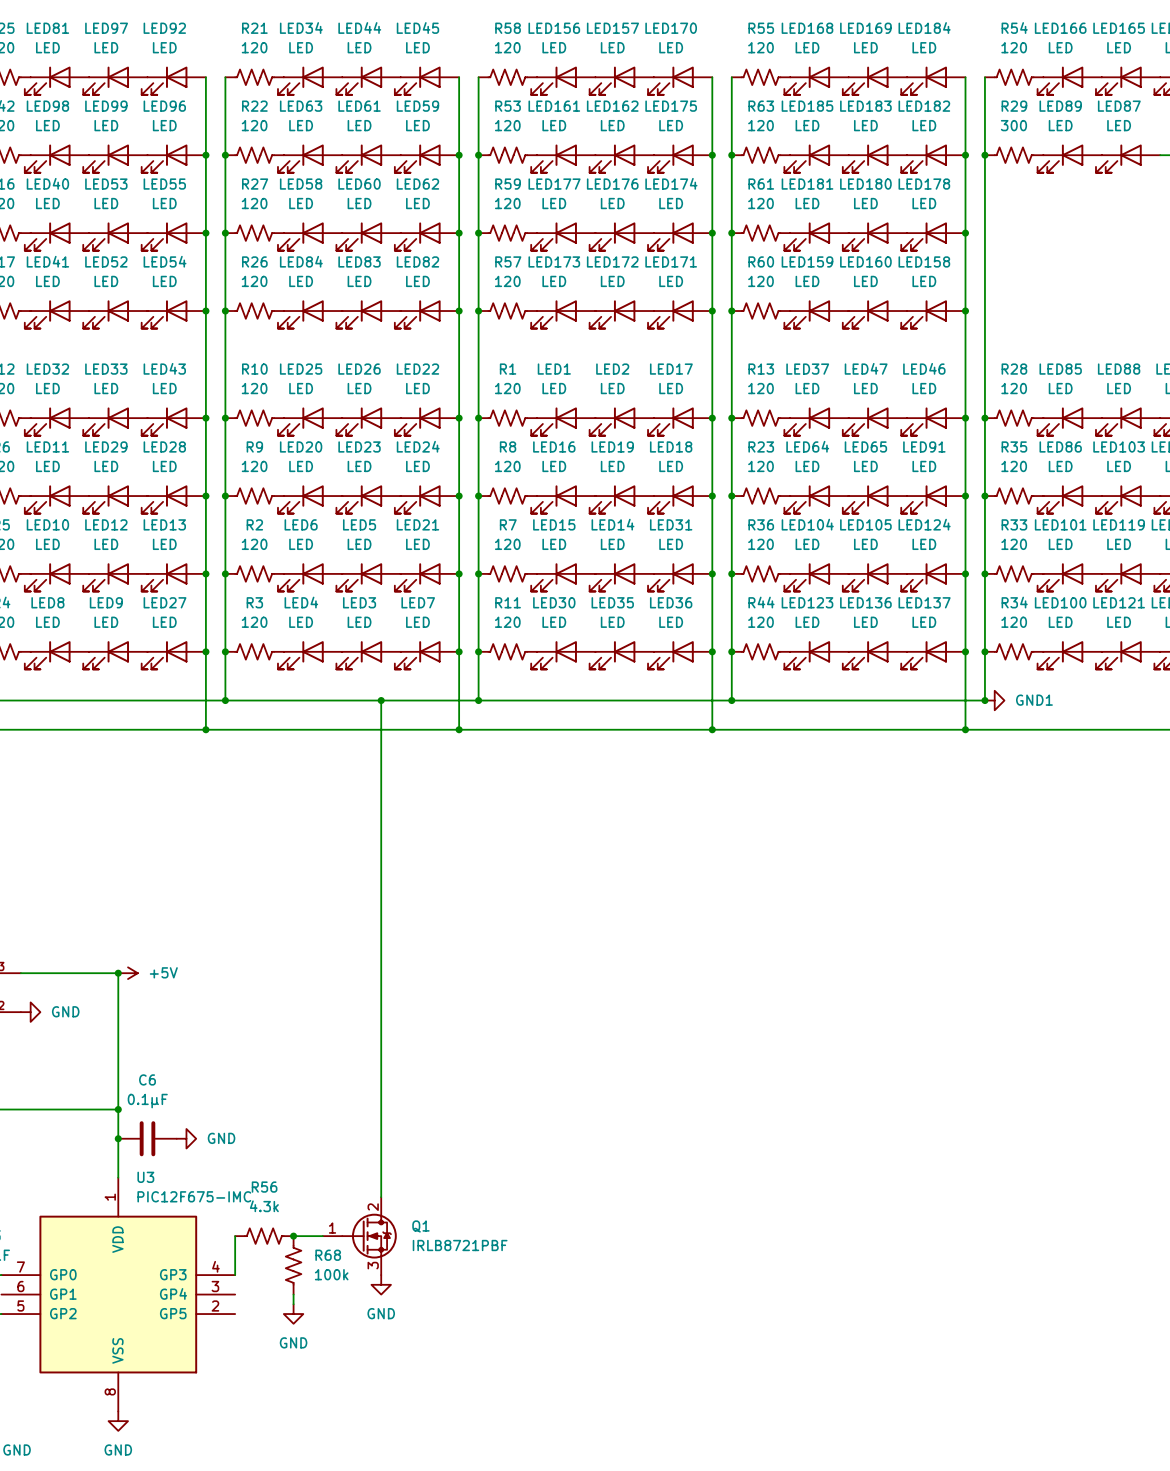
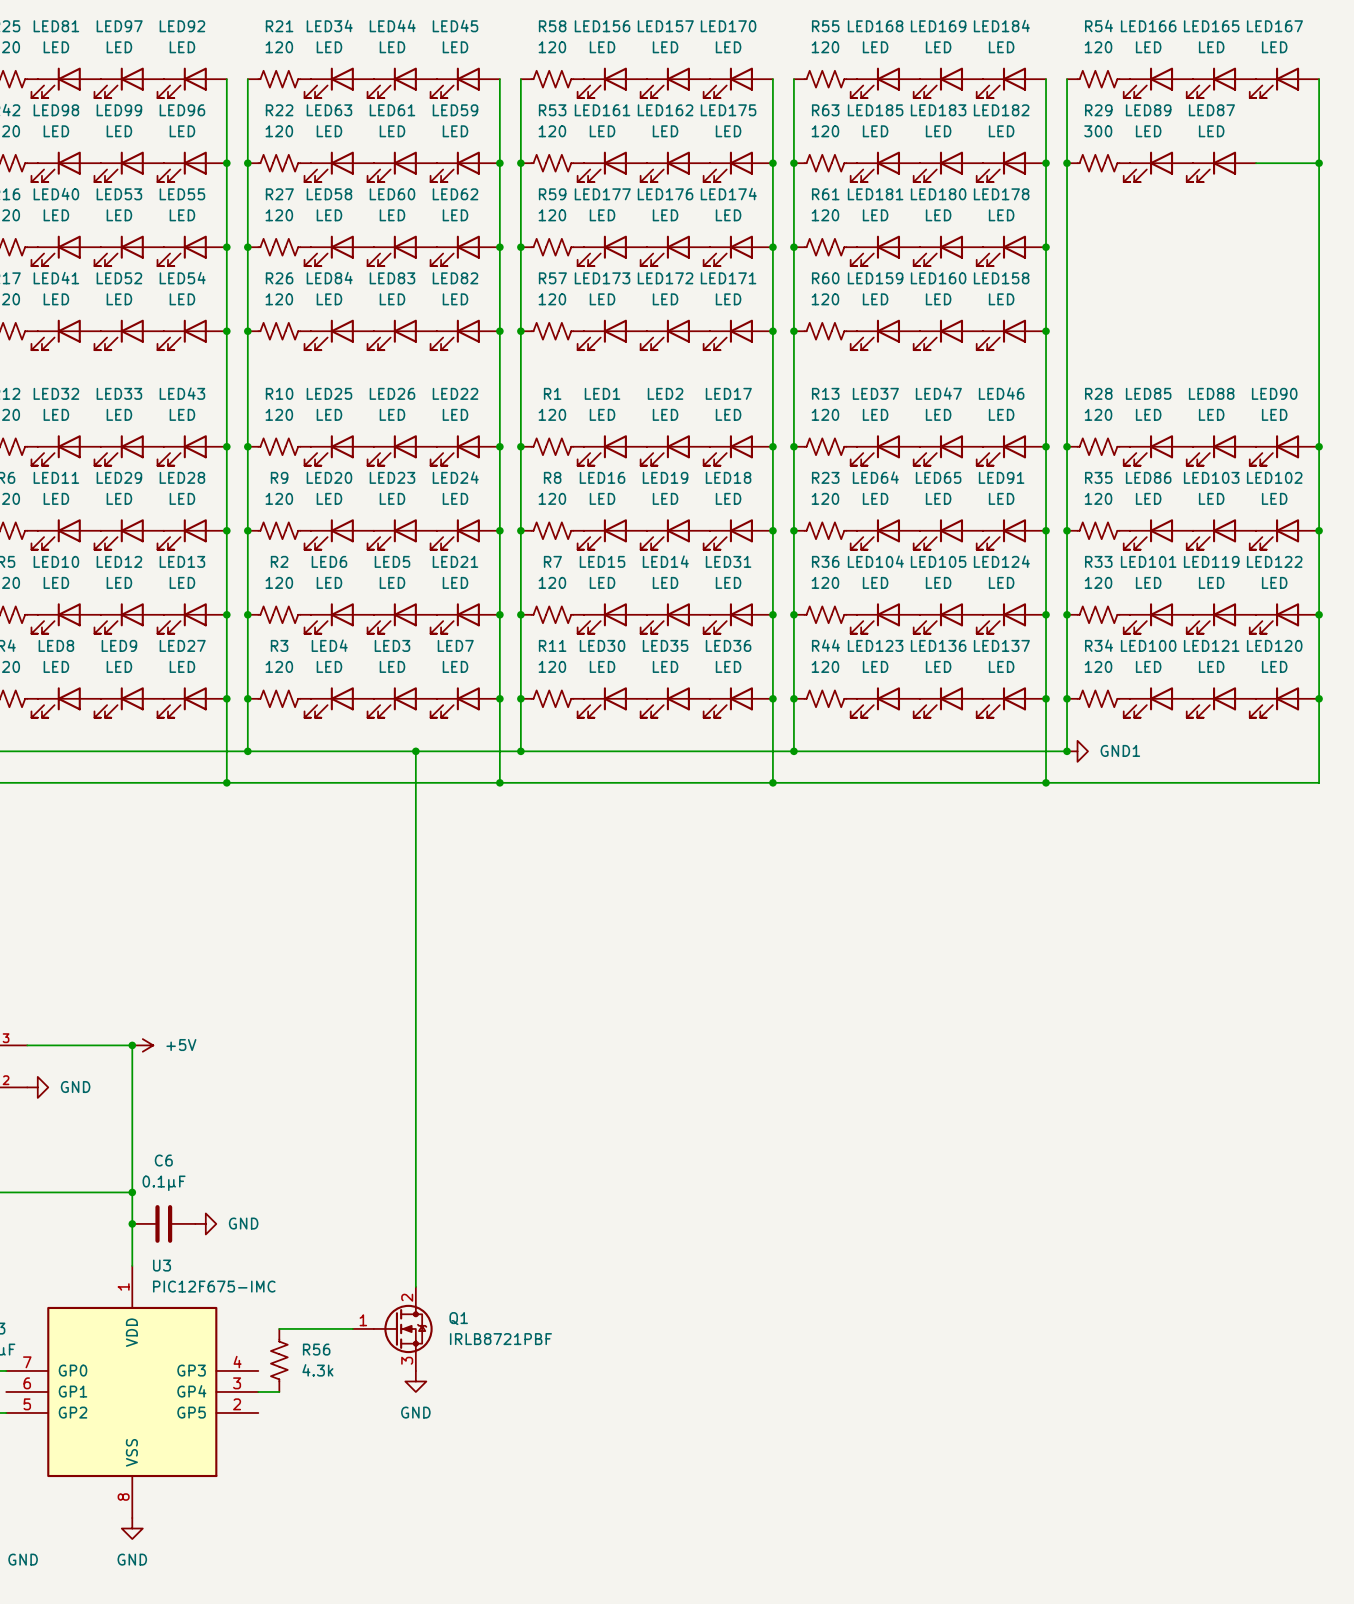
R56 name position: R56 (264, 1187) -> R56 (316, 1349)
wire: (235, 1236) (235, 1275) -> none
wire: none -> (279, 1328) (321, 1328)
R56 rotation: 0° (264, 1236) -> 90° clockwise (279, 1360)
junction: (293, 1236) -> none
R68: 100k (293, 1265) -> none
wire: none -> (258, 1391) (279, 1391)
wire: (293, 1294) (293, 1304) -> none
power symbol: GND (293, 1314) -> none

